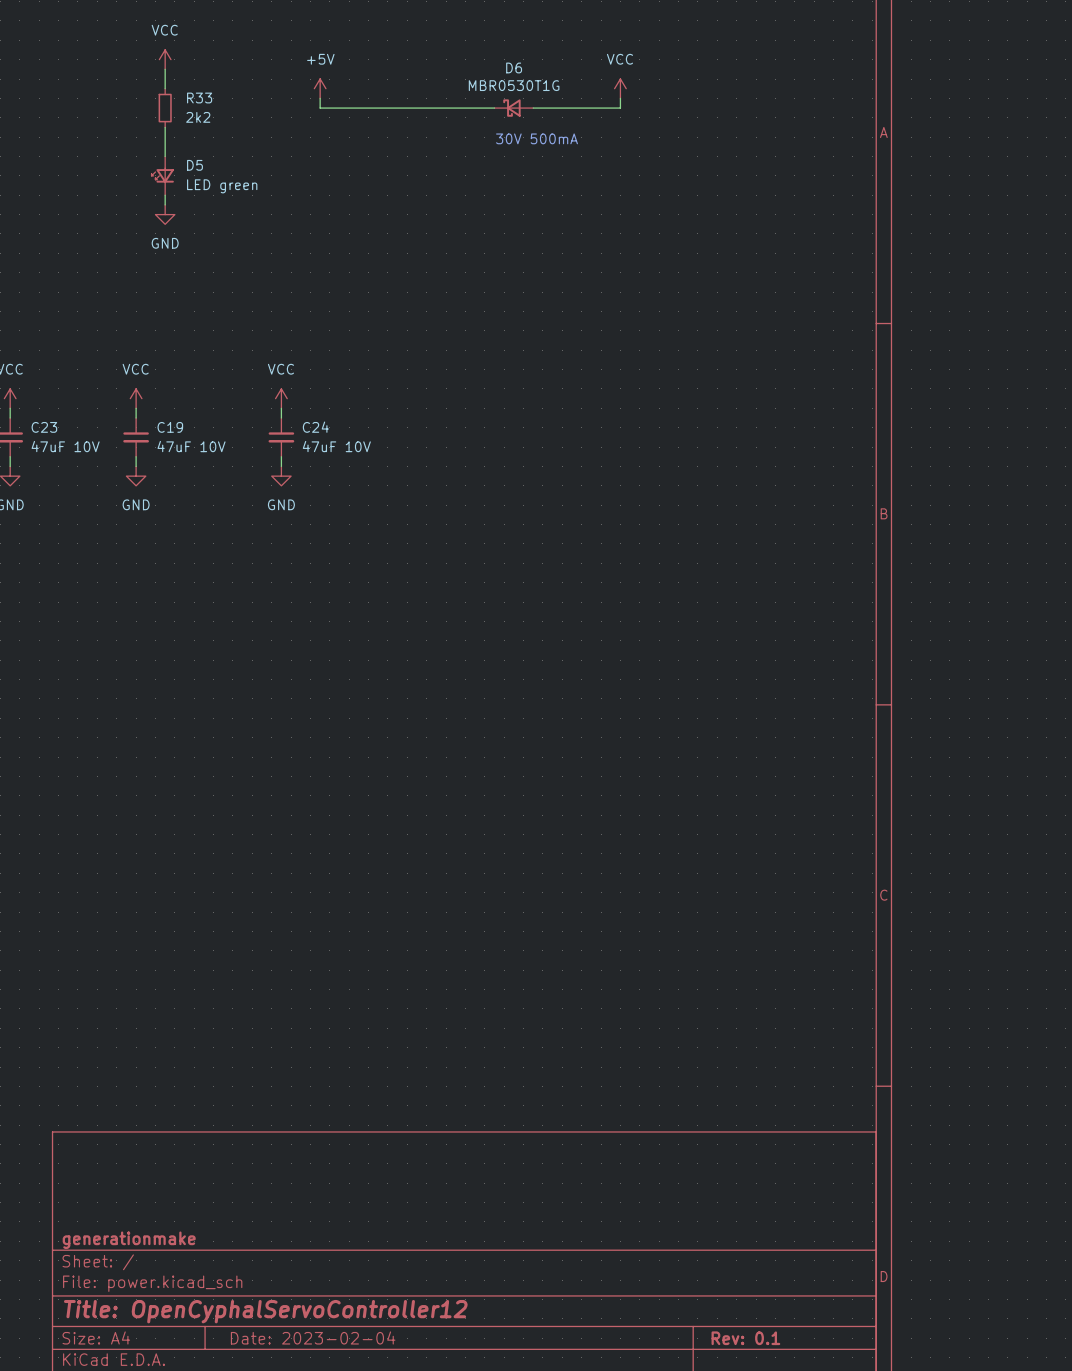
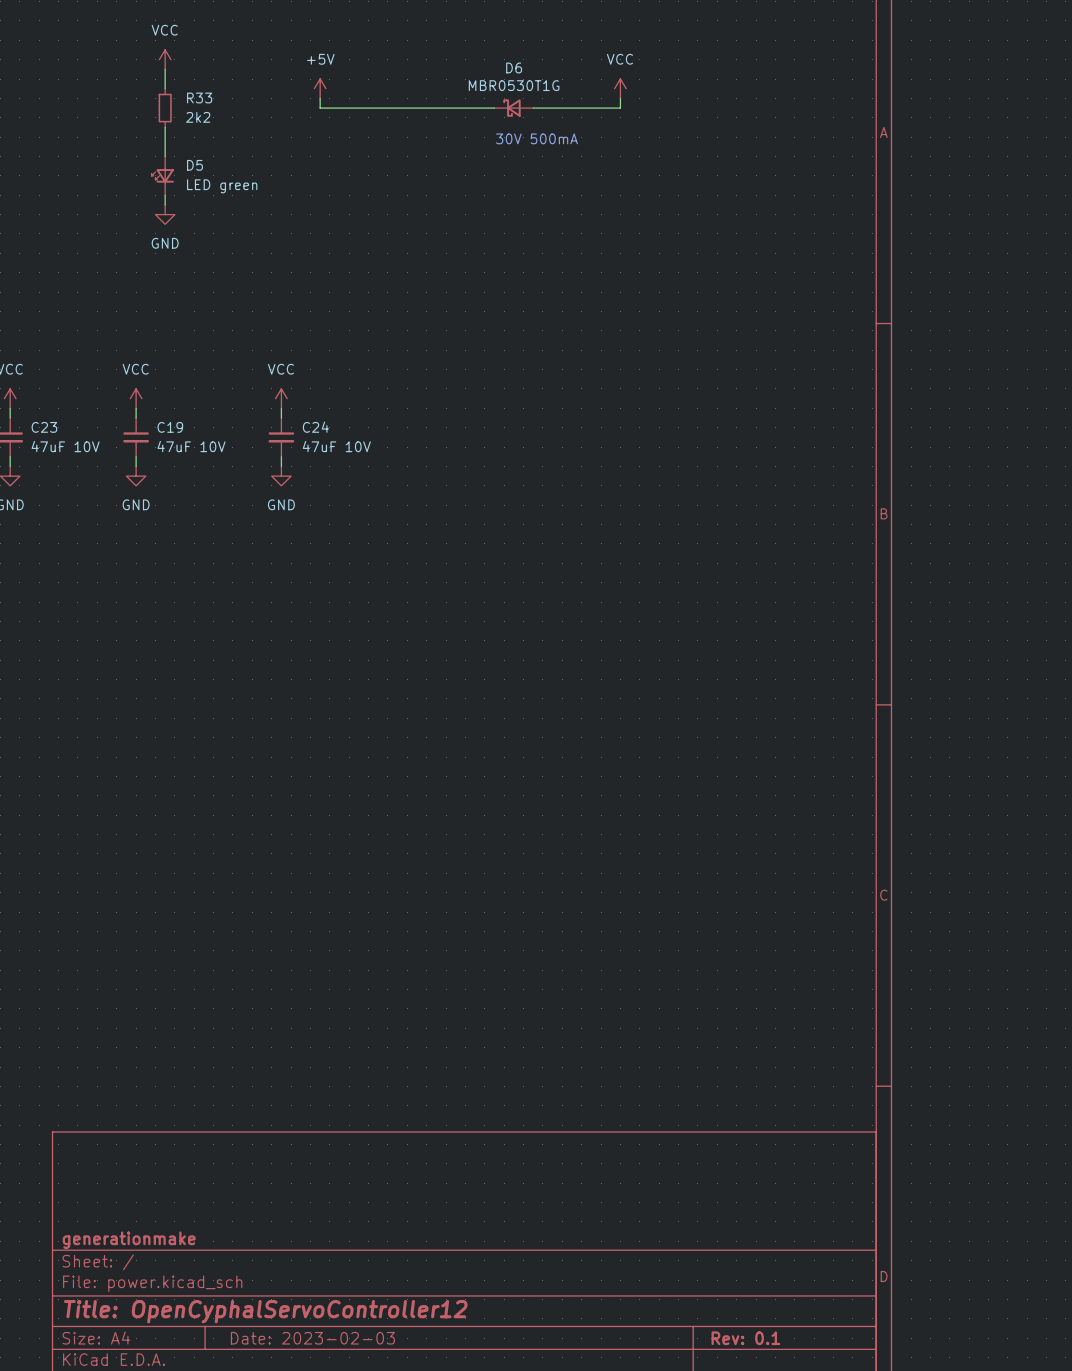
title block: Date: 2023-02-04 (313, 1337) -> Date: 2023-02-03 (312, 1338)

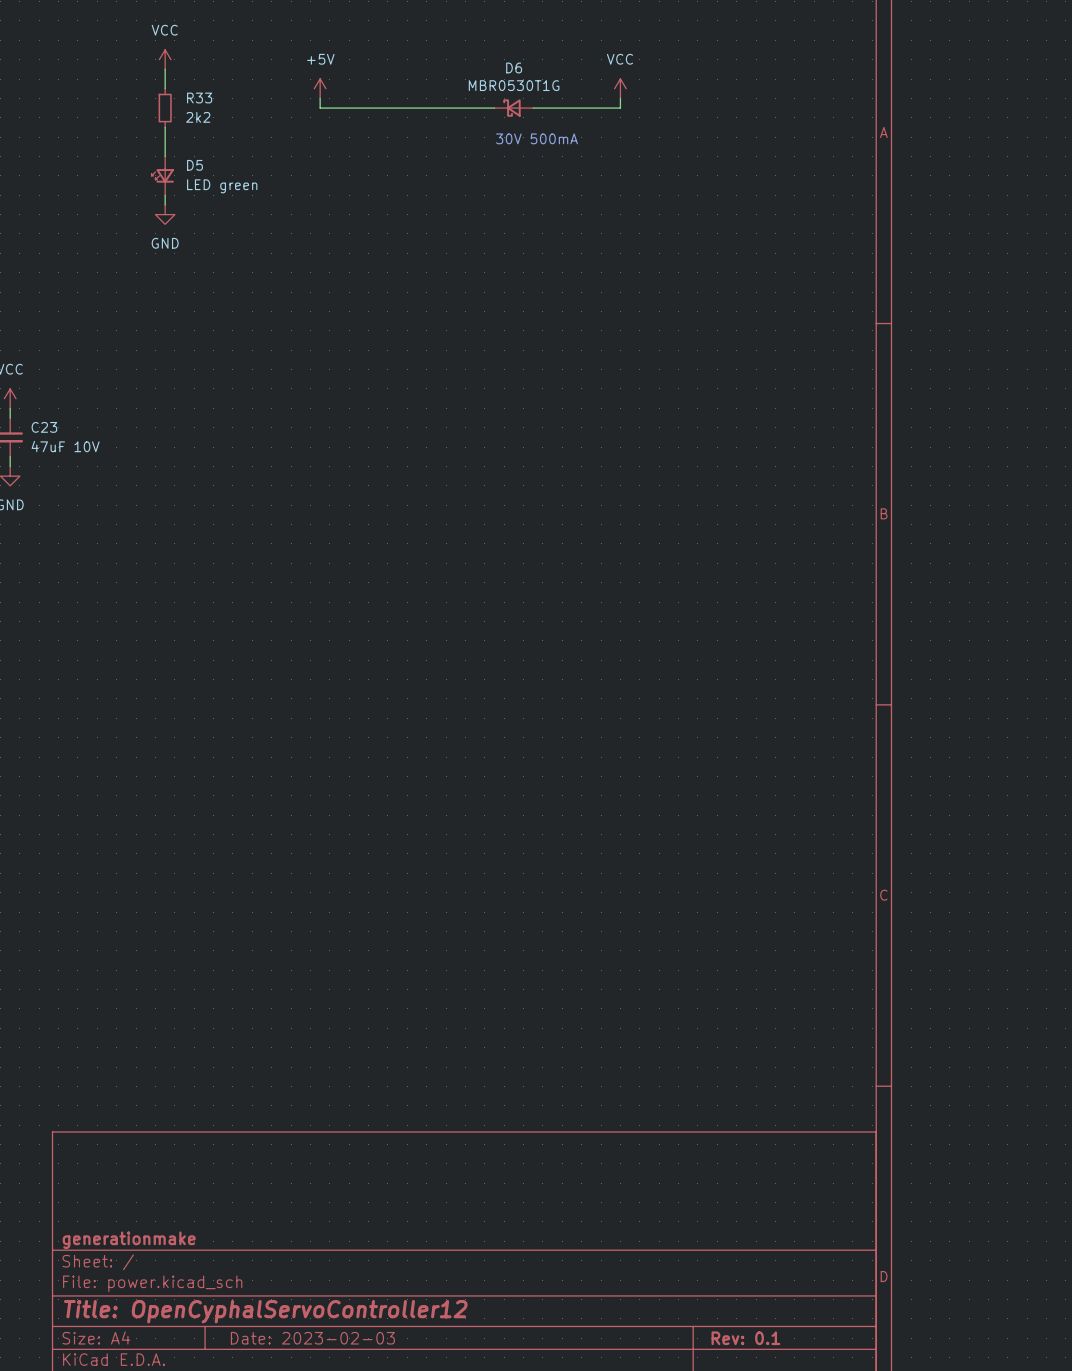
power symbol: VCC (136, 398) -> none
power symbol: VCC (281, 398) -> none
wire: (136, 408) (136, 418) -> none
wire: (281, 408) (281, 418) -> none
C19: 47uF 10V (136, 437) -> none
C24: 47uF 10V (281, 437) -> none
wire: (136, 456) (136, 466) -> none
wire: (281, 456) (281, 466) -> none
power symbol: GND (136, 476) -> none
power symbol: GND (281, 476) -> none

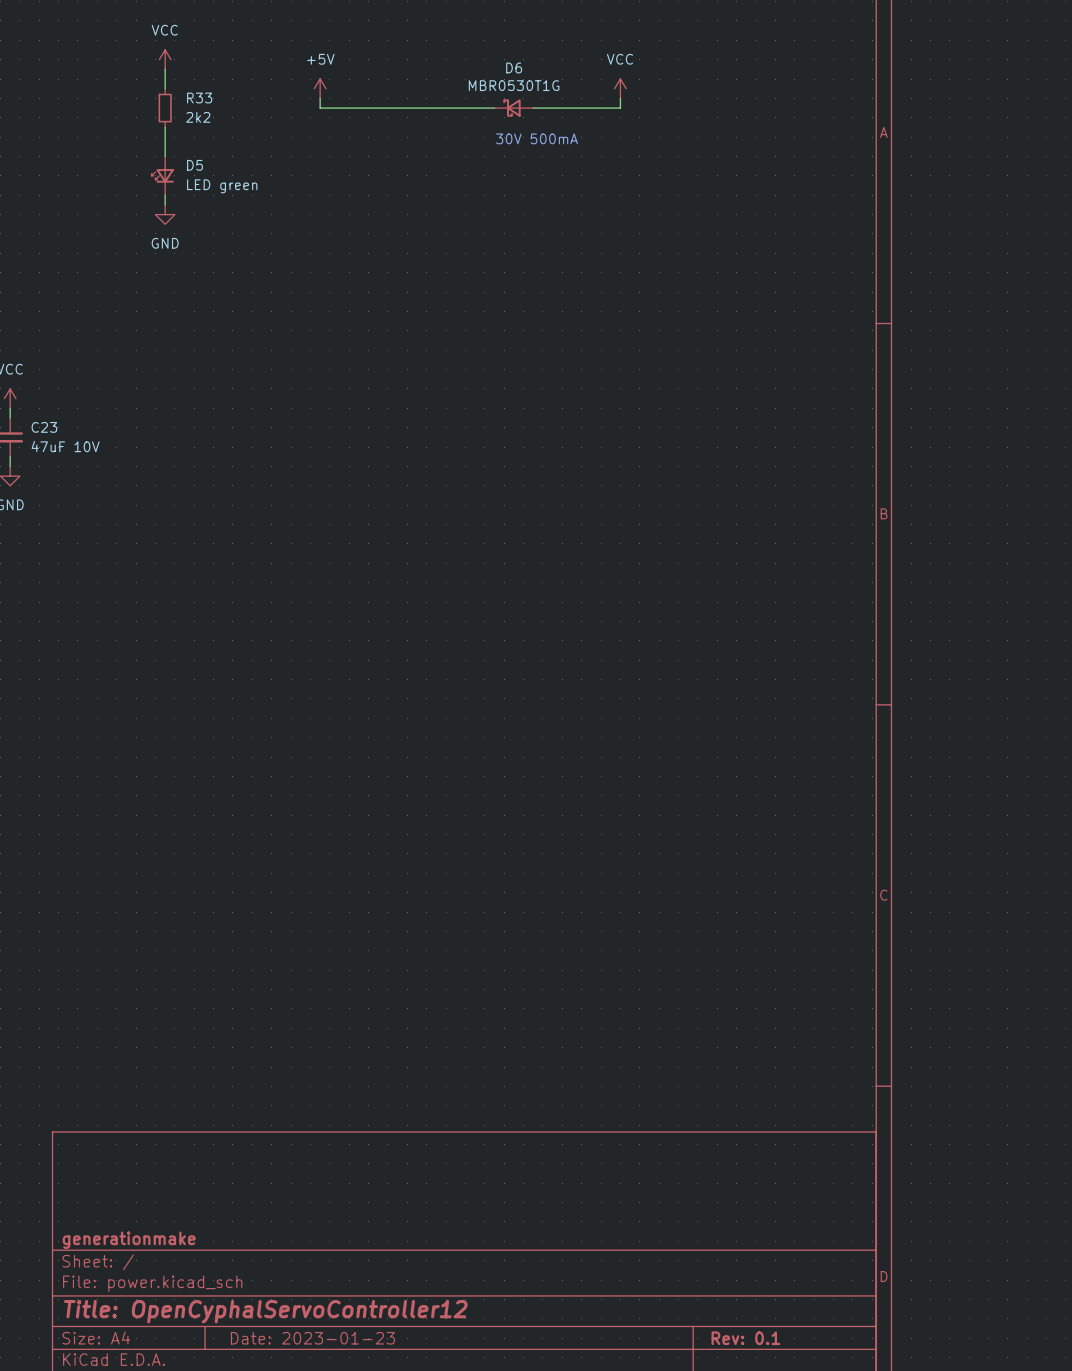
title block: Date: 2023-02-03 (312, 1338) -> Date: 2023-01-23 (312, 1338)

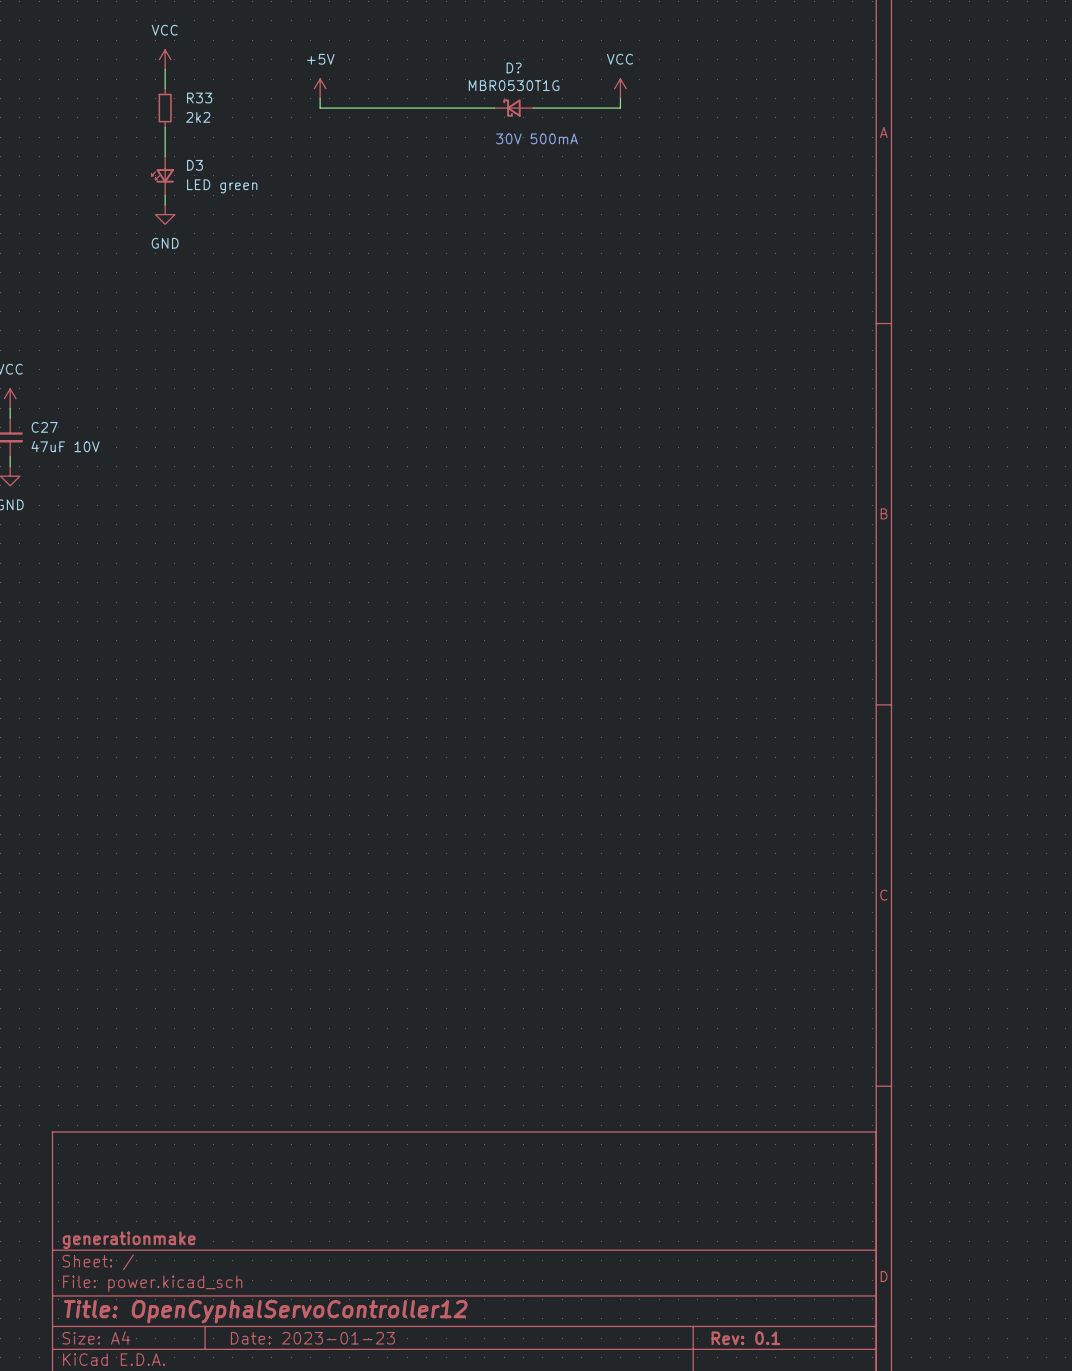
D6 name: D6 (514, 67) -> D? (514, 67)
D5 name: D5 (194, 165) -> D3 (194, 165)
C23 name: C23 (44, 427) -> C27 (44, 427)

